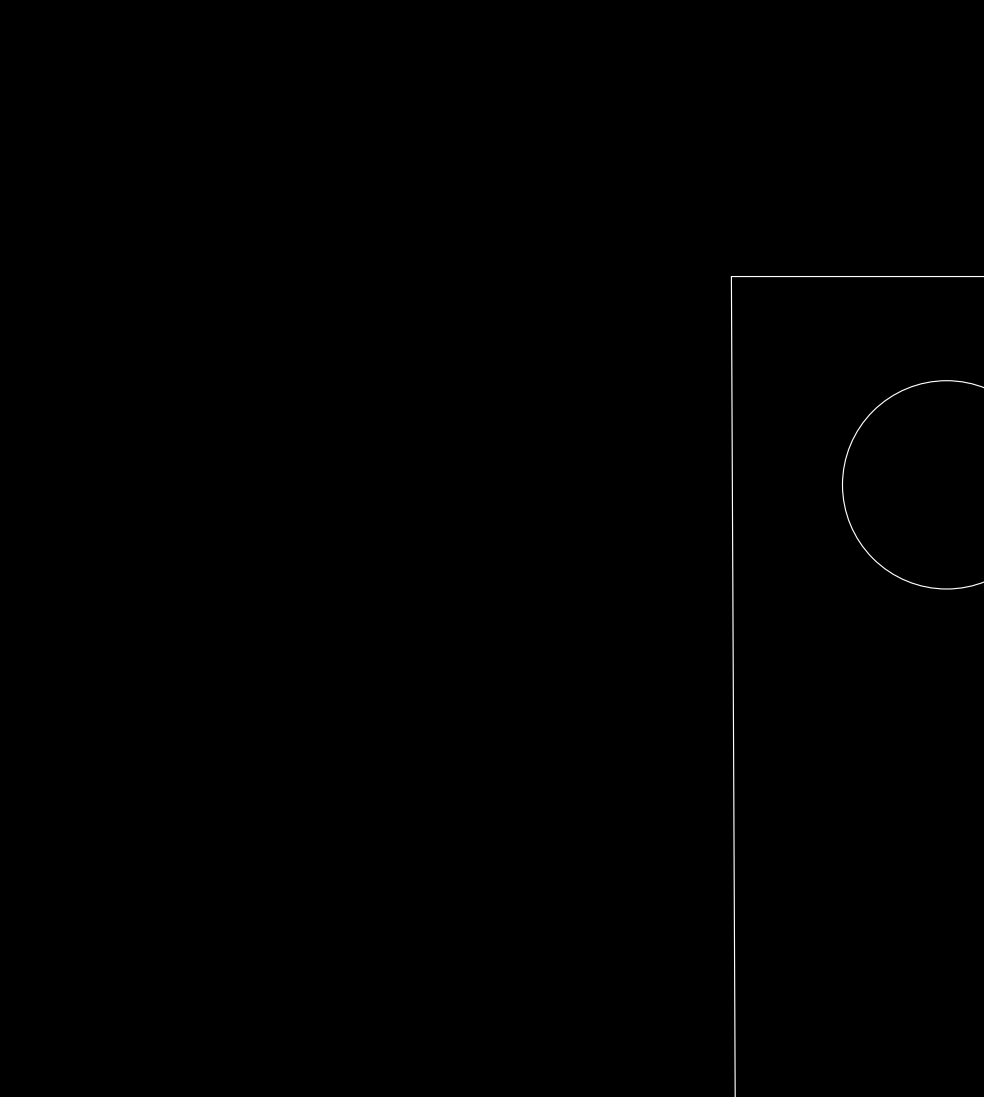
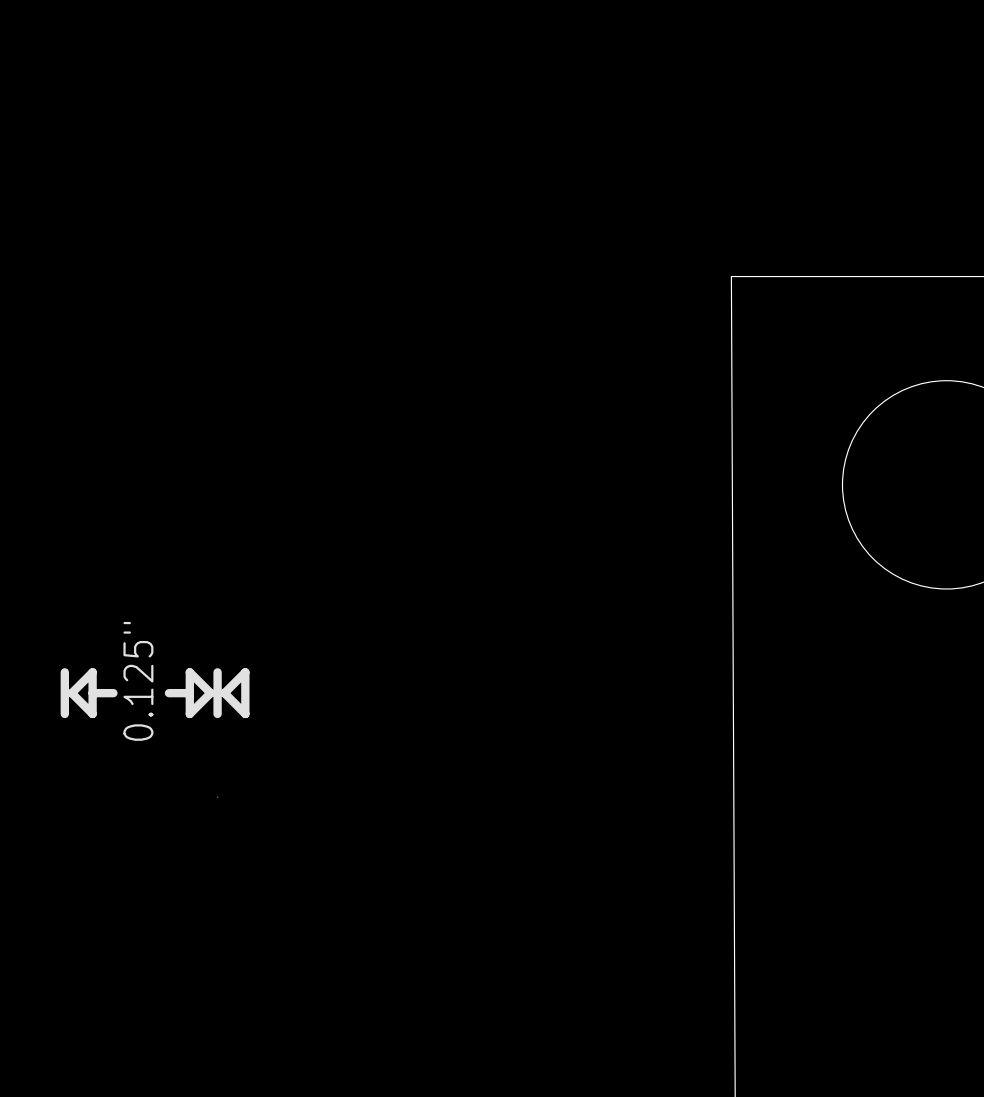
line: none -> (64, 672) (64, 713)
line: none -> (92, 672) (92, 713) (71, 693) (92, 672)
line: none -> (189, 672) (189, 713) (210, 693) (189, 672)
line: none -> (217, 672) (217, 713)
line: none -> (245, 672) (224, 693) (245, 713) (245, 672)
text: none -> 0.125" (138, 681)
line: none -> (113, 693) (92, 693)
line: none -> (189, 693) (168, 693)

